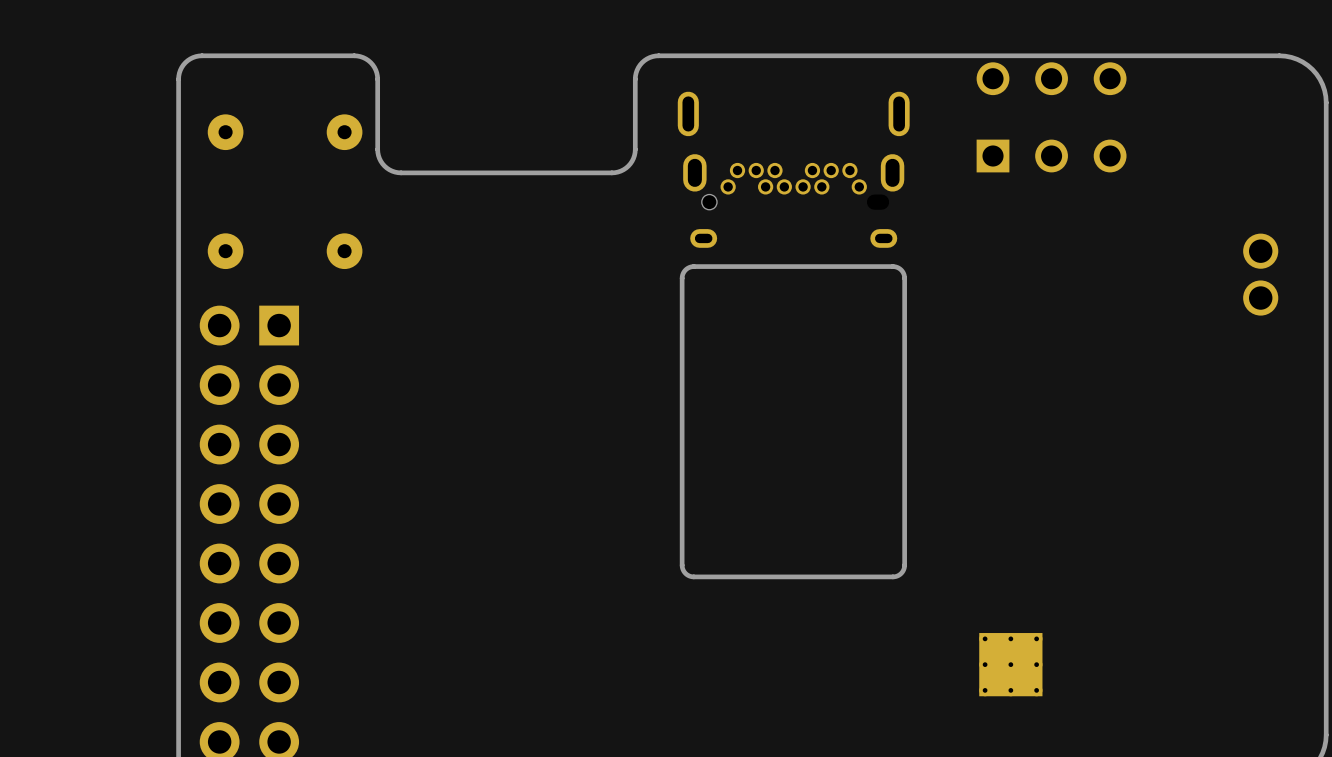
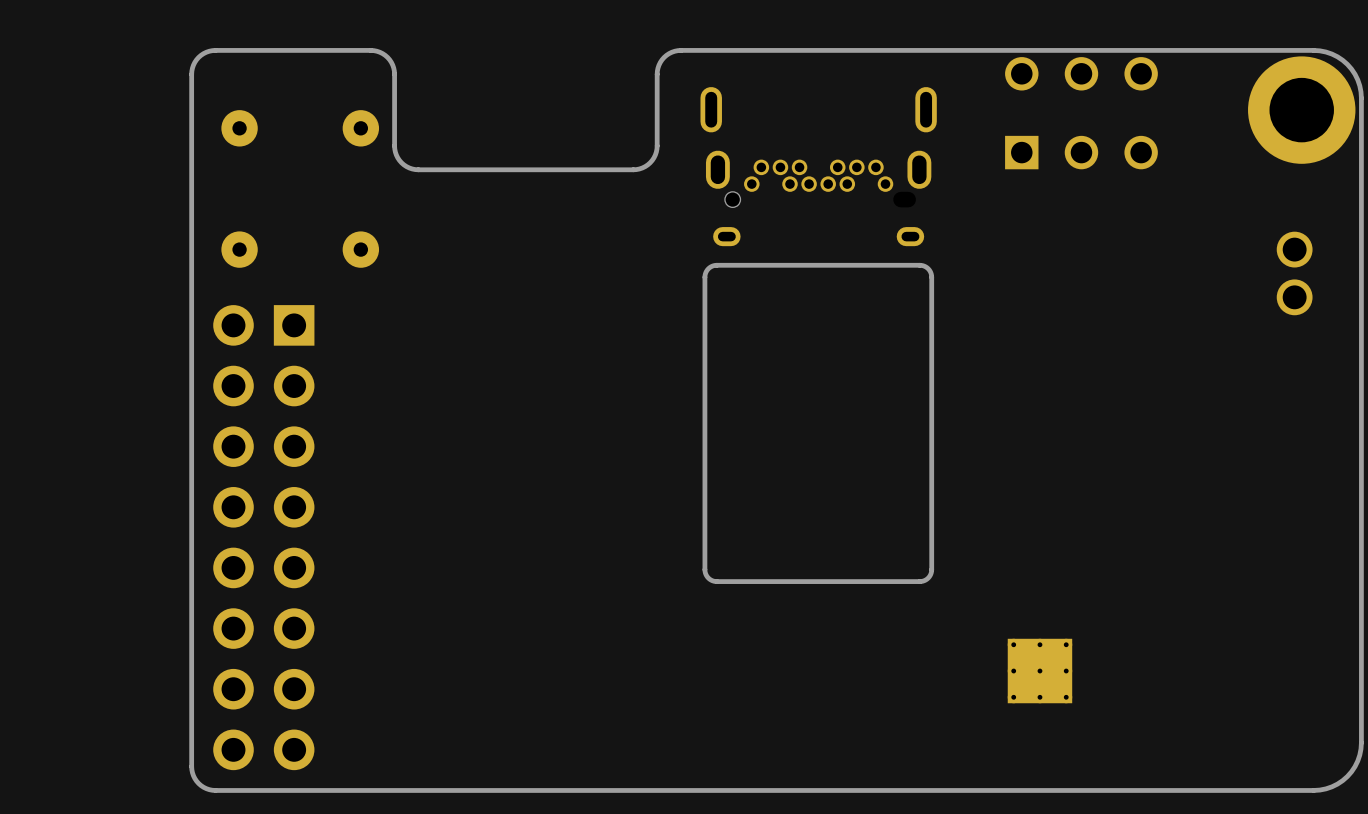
part: none -> (1301, 110)

